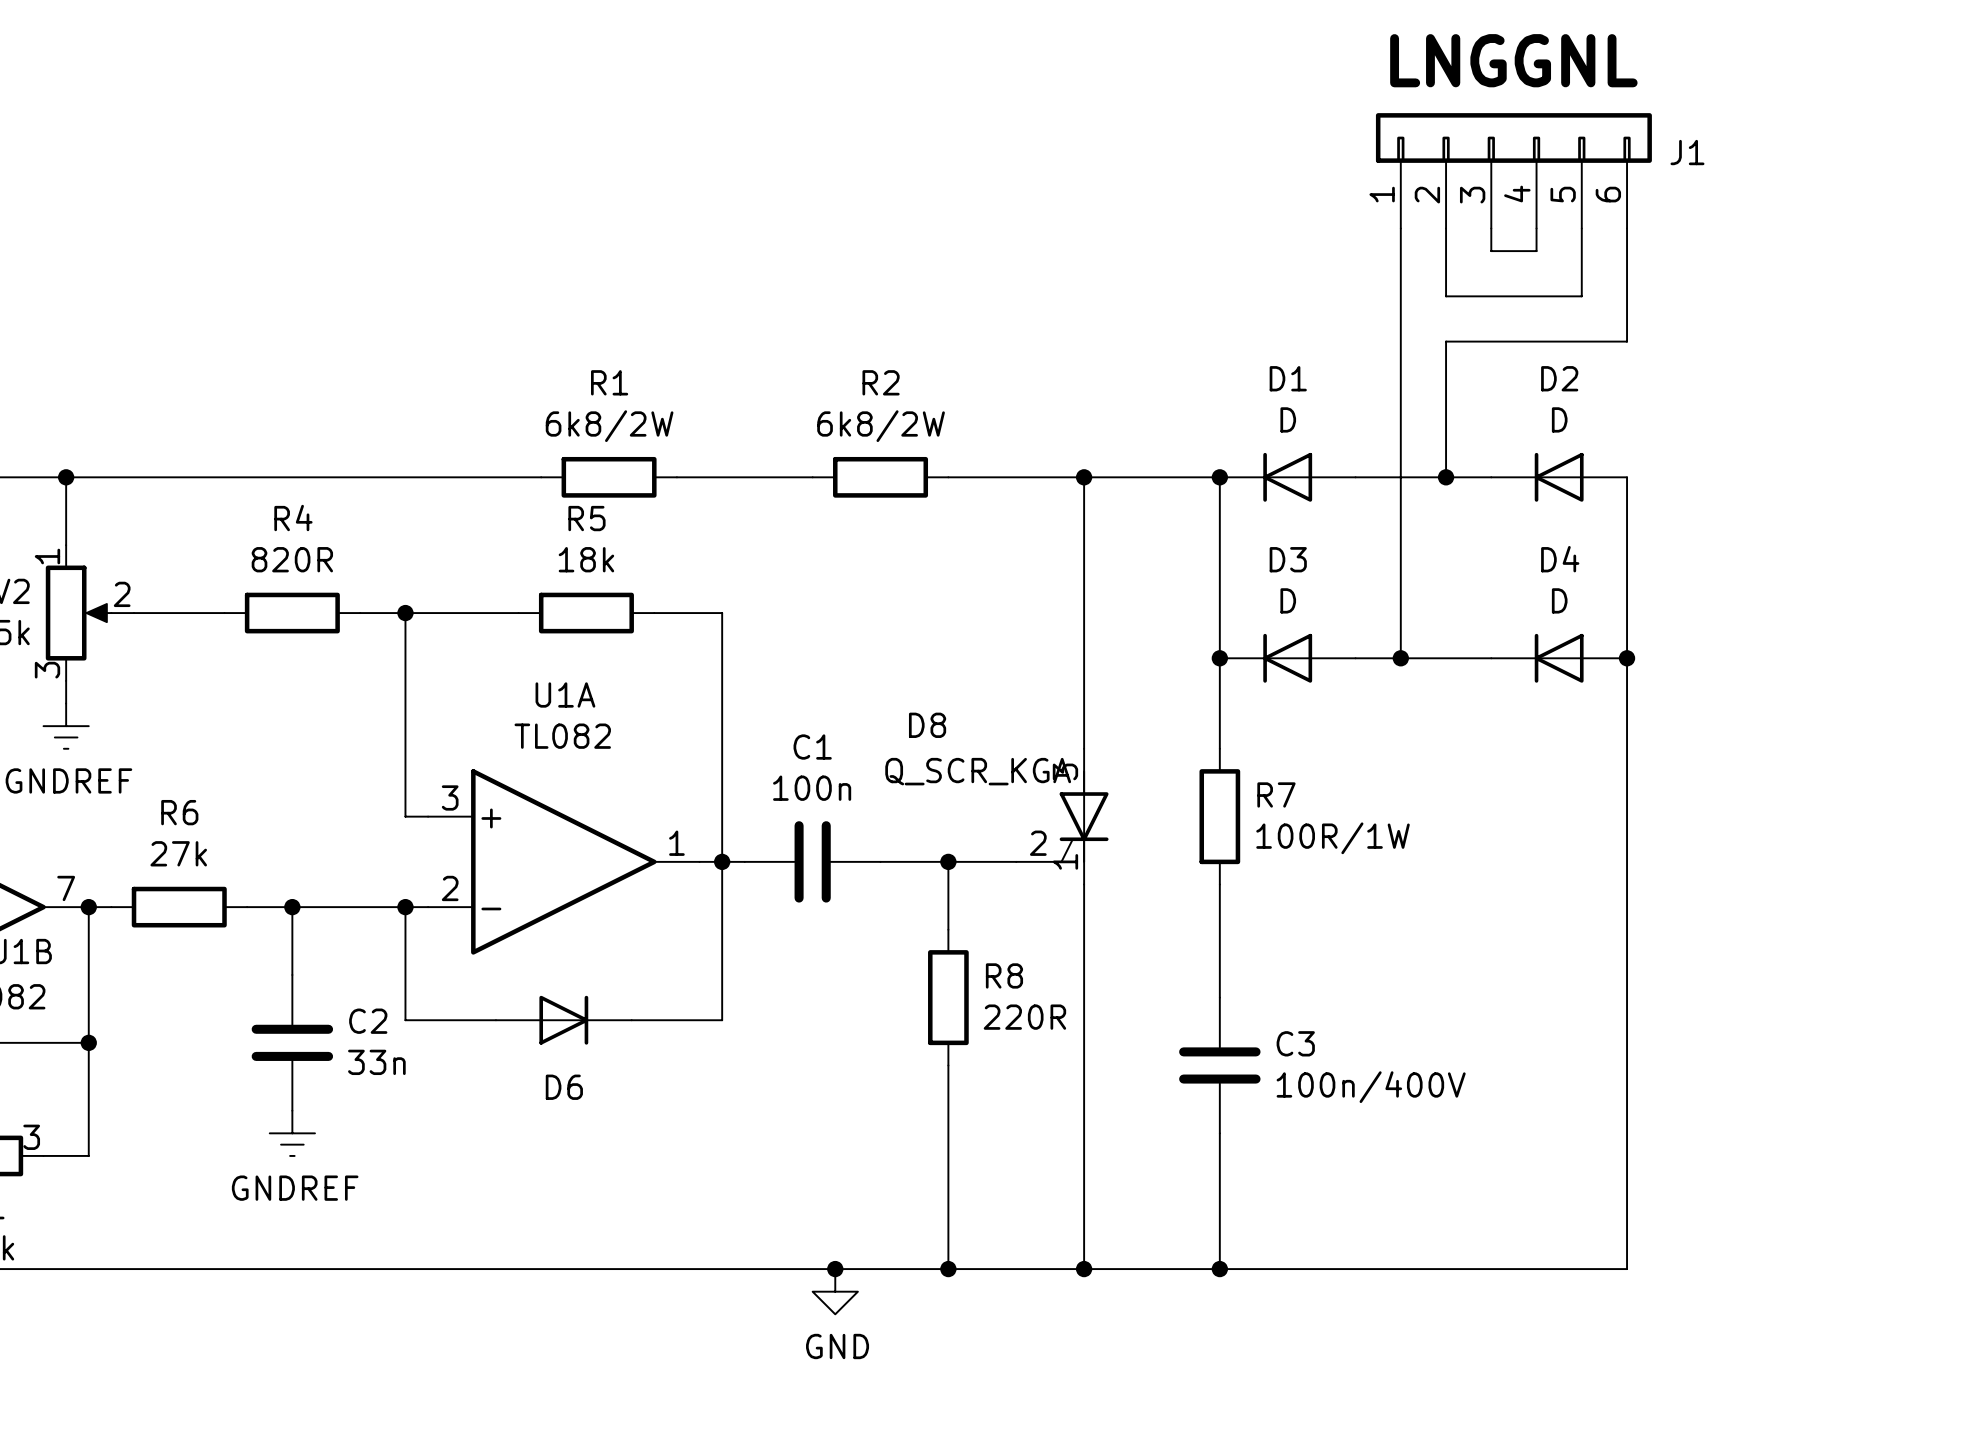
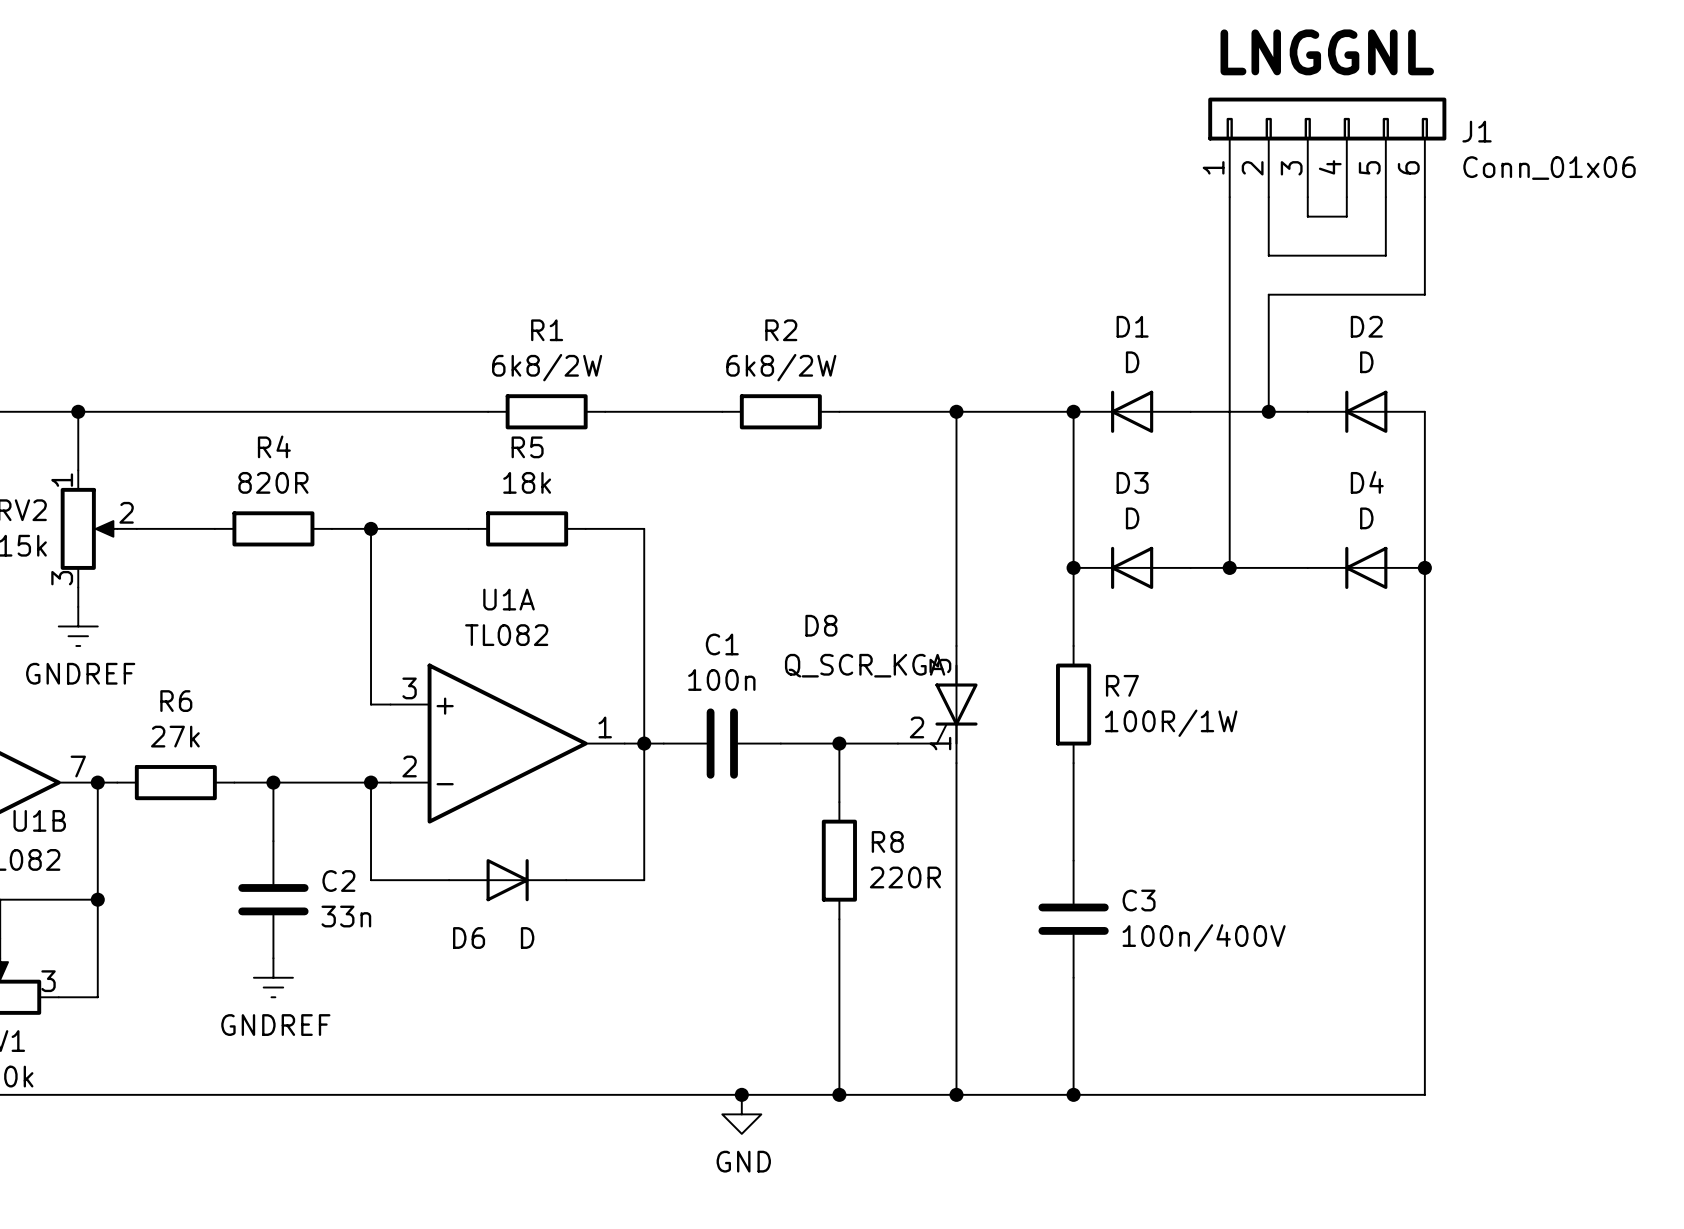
J1 value: none -> Conn_01x06 (1549, 168)
D6 name position: D6 (564, 1087) -> D6 (469, 937)
D6 value: none -> D (527, 937)

